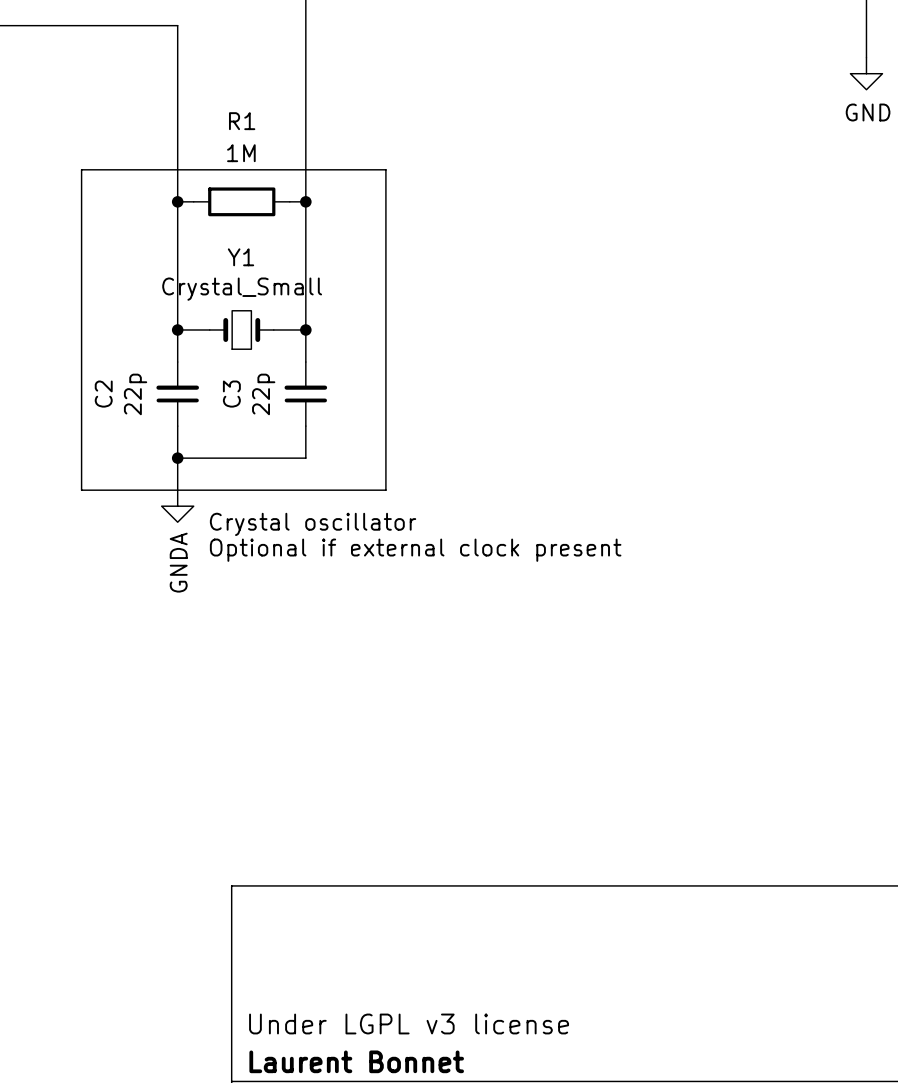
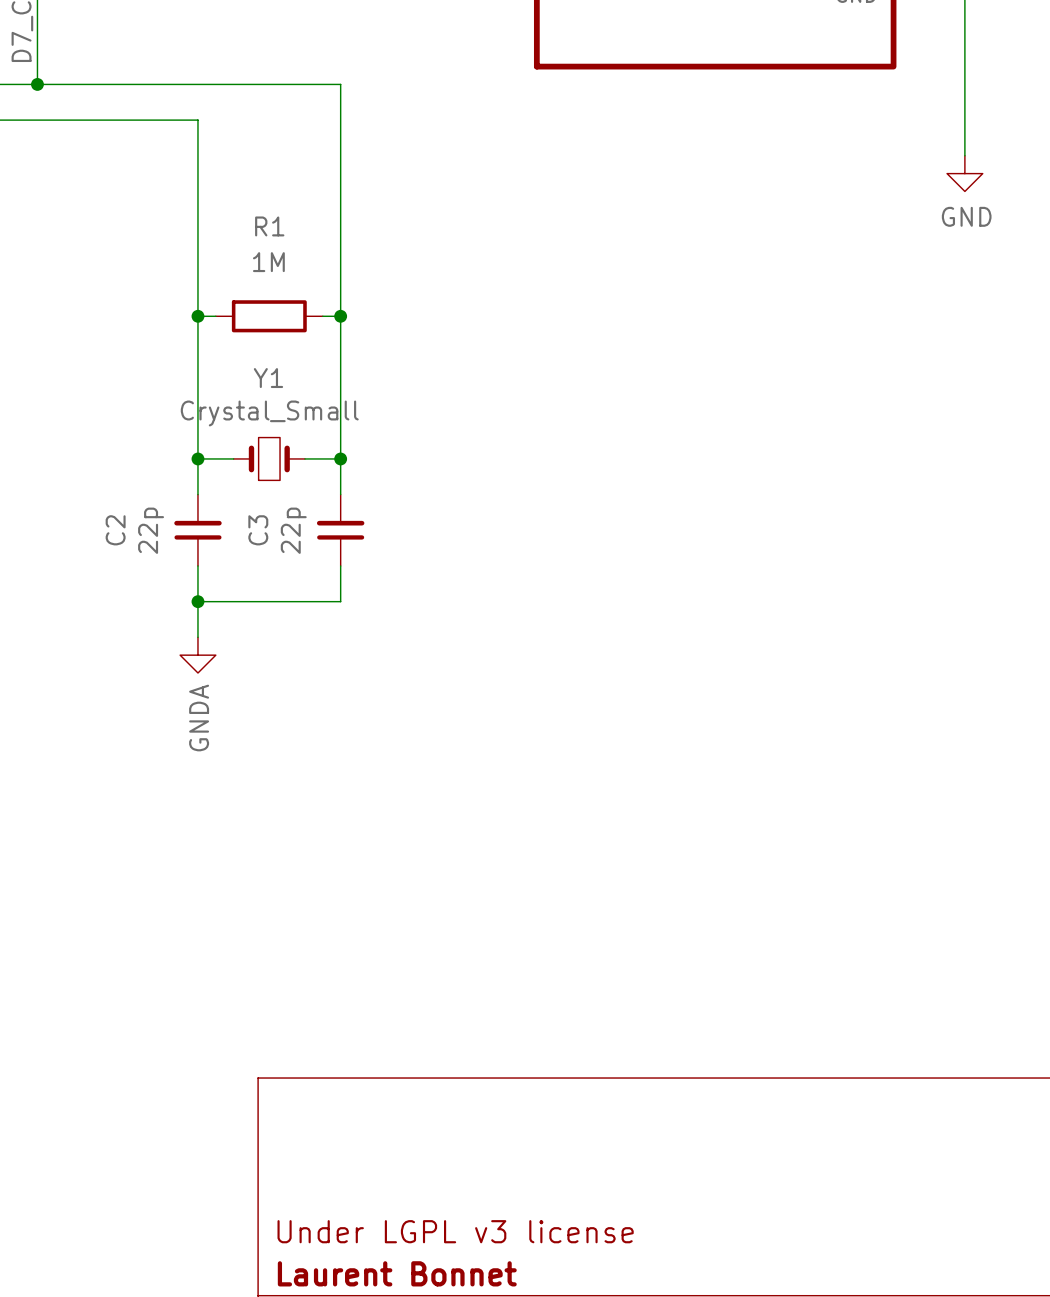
line: (81, 169) (385, 169) (385, 490) (81, 490) (81, 169) -> none
text: Crystal oscillator (313, 524) -> none
text: Optional if external clock present (415, 550) -> none

